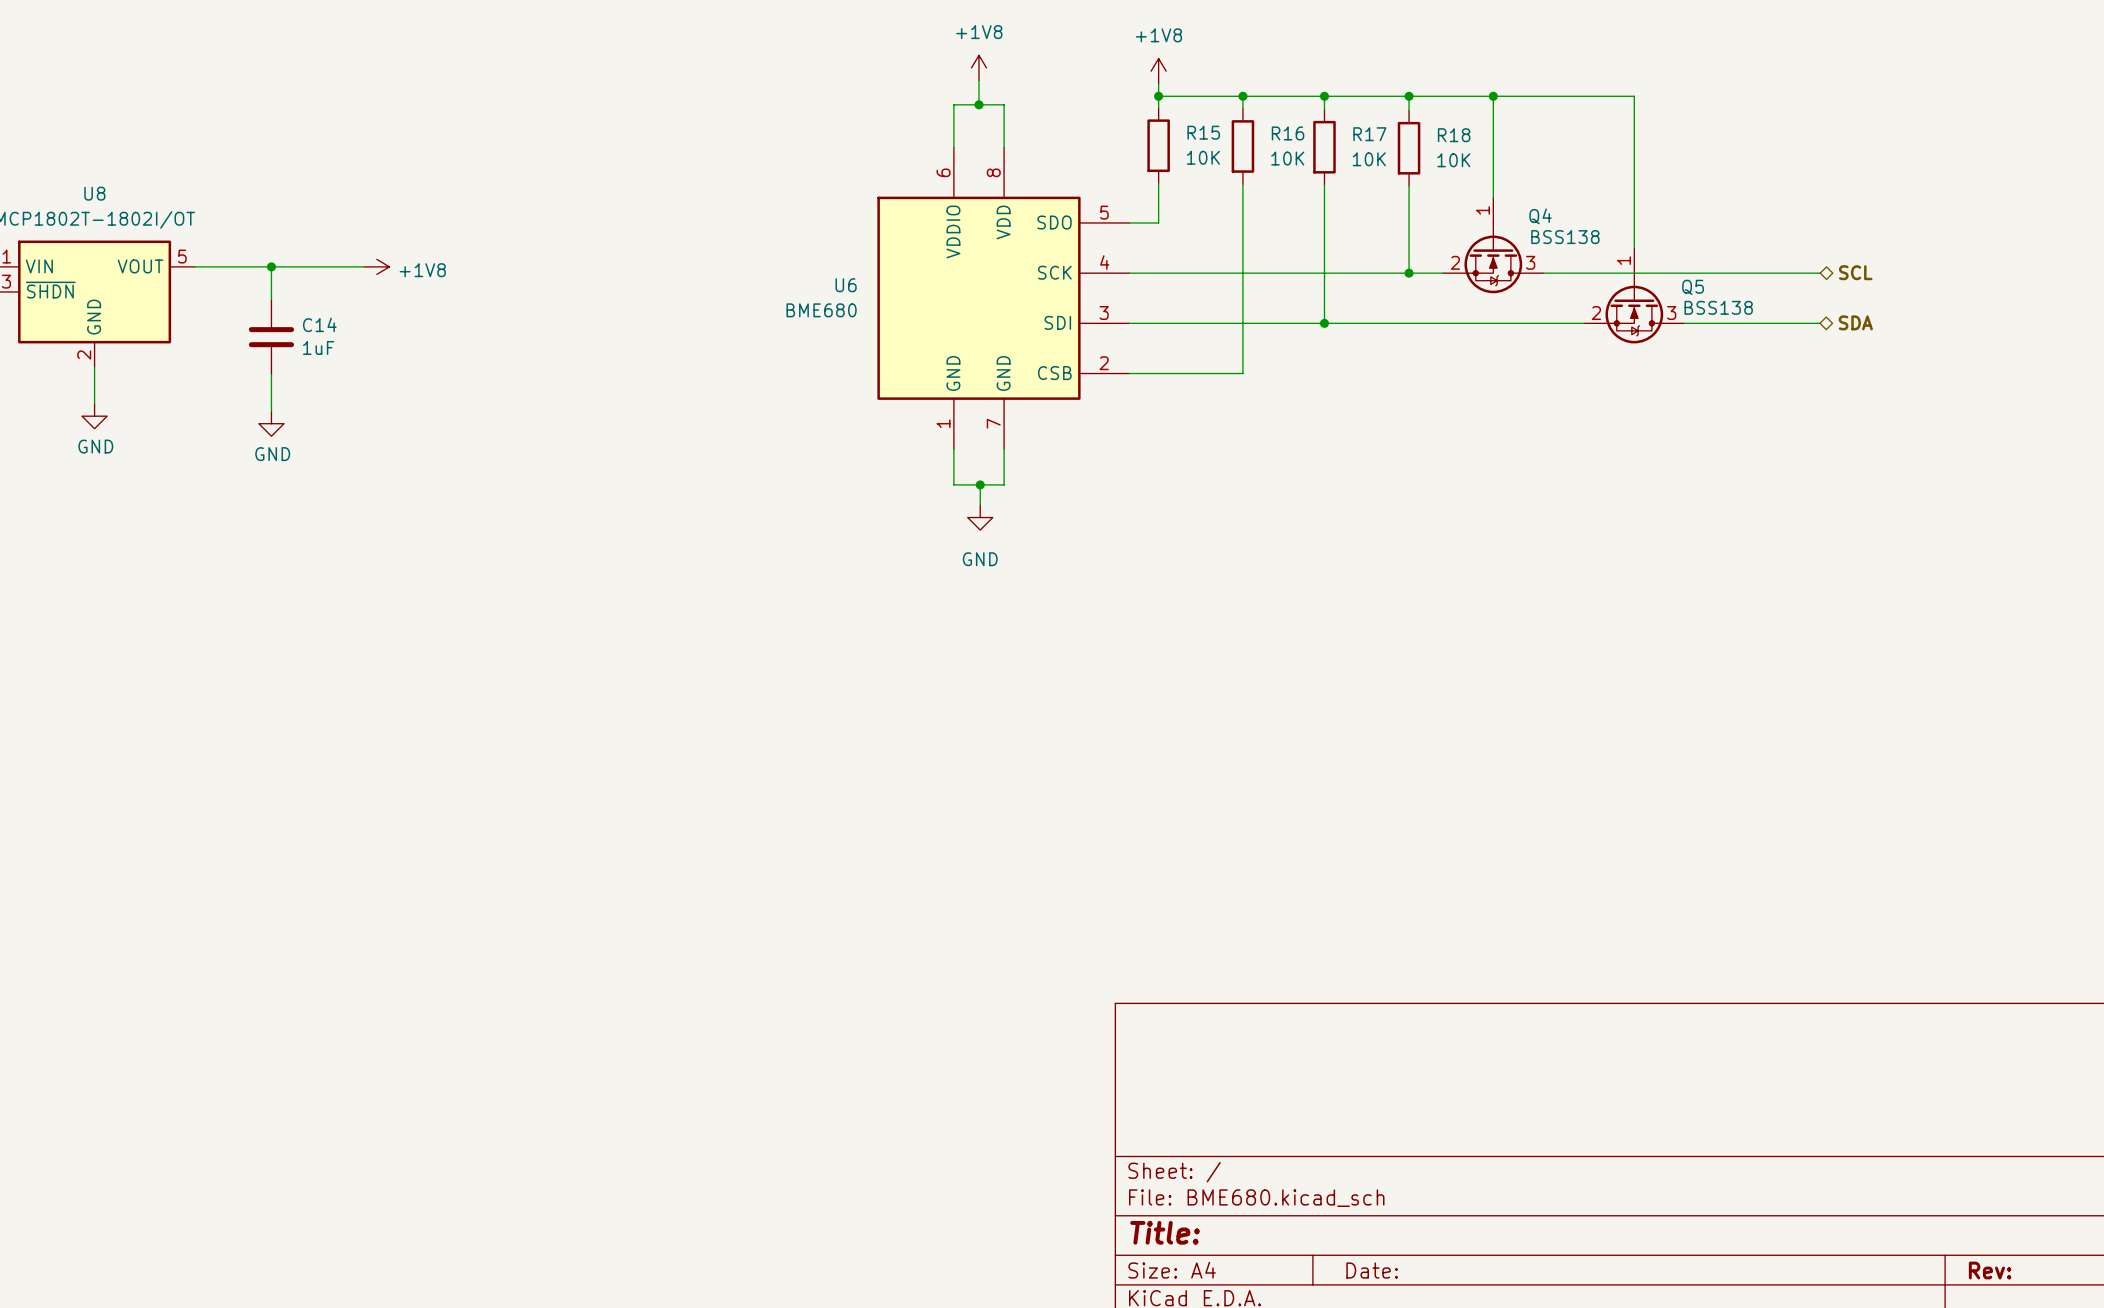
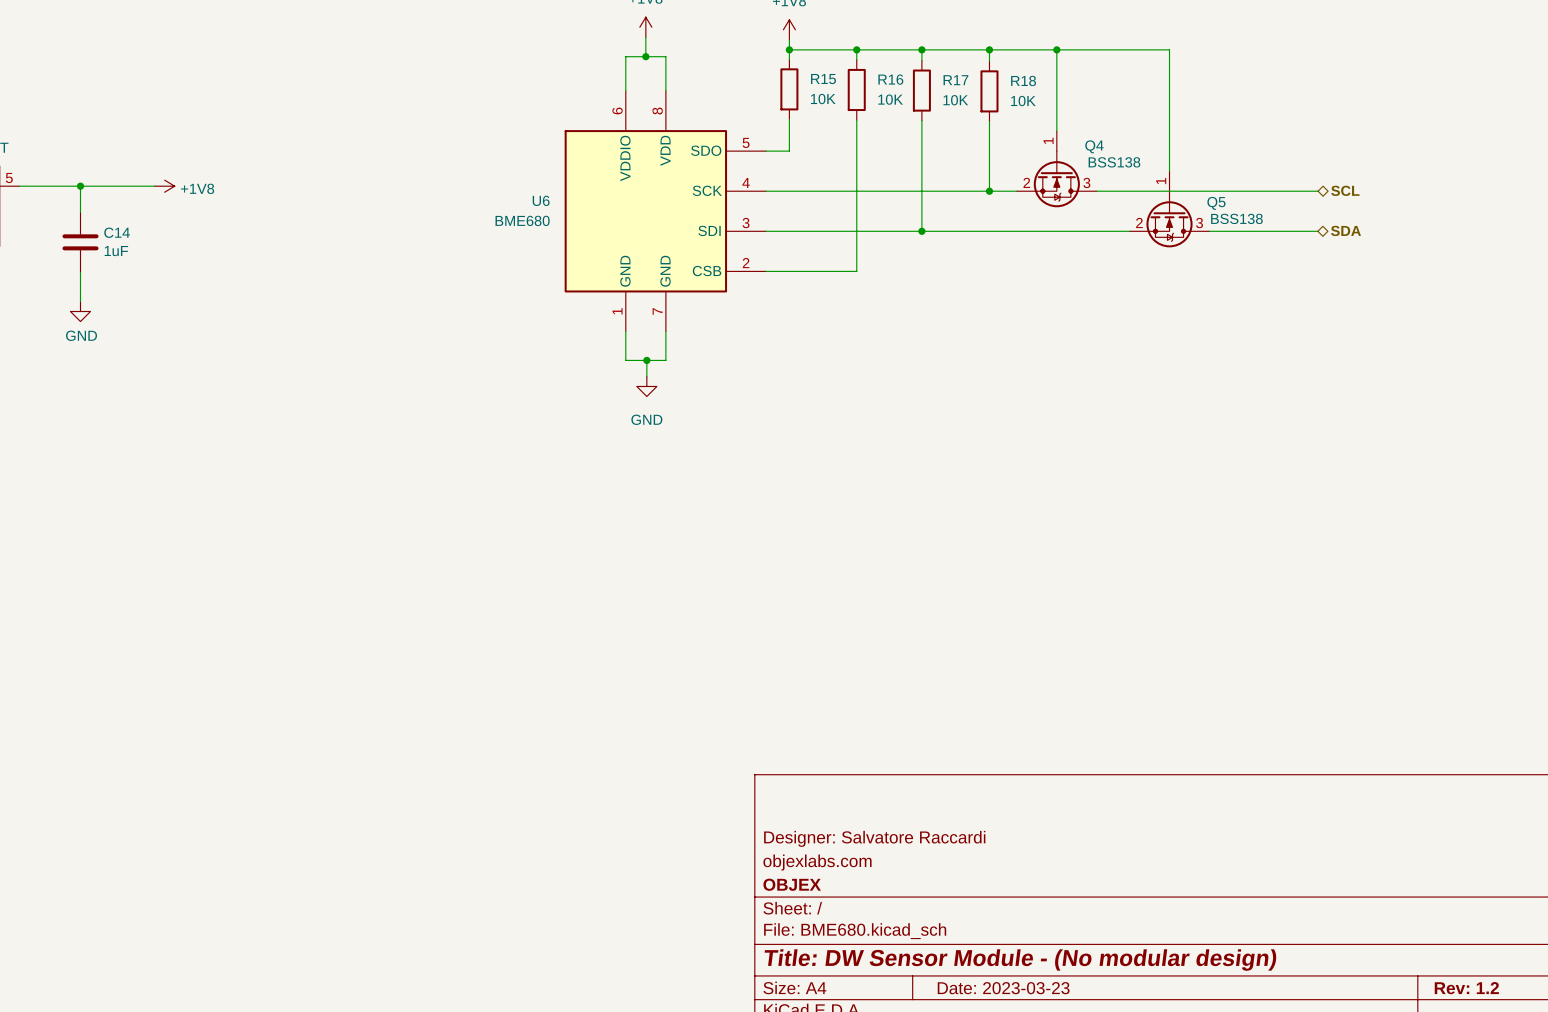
title block: none -> Designer: Salvatore Raccardi (874, 838)
title block: none -> objexlabs.com (817, 862)
title block: none -> OBJEX (792, 884)
title block: Title: (1165, 1232) -> Title: DW Sensor Module - (No modular design) (1020, 960)
title block: Date: (1372, 1270) -> Date: 2023-03-23 (1003, 988)
title block: Rev: (1990, 1270) -> Rev: 1.2 (1466, 988)

